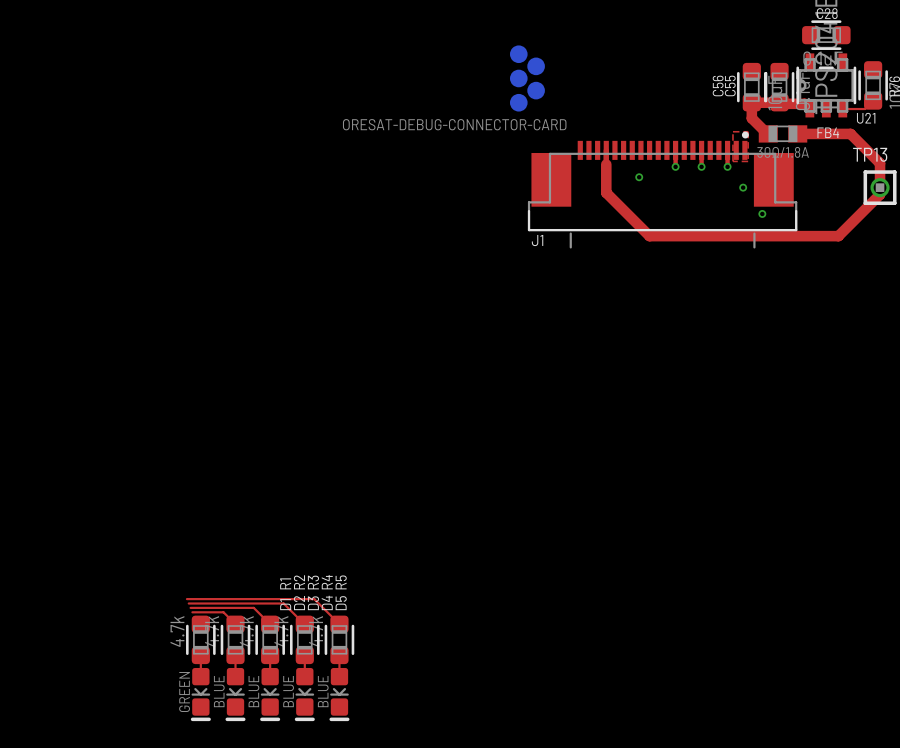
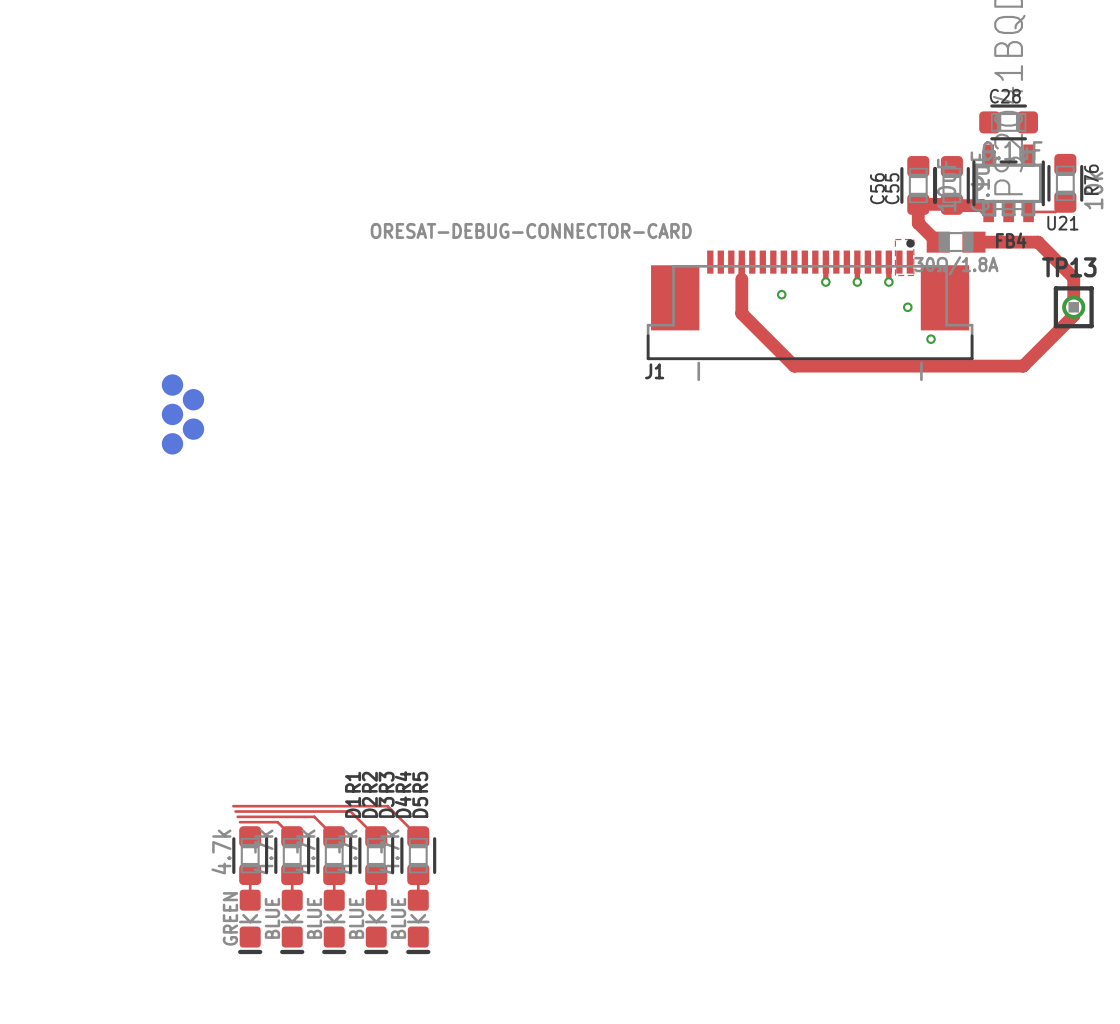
part: (518, 54) -> none
part: (536, 66) -> none
part: (518, 78) -> none
part: (536, 90) -> none
part: (518, 102) -> none
part: none -> (172, 385)
part: none -> (193, 399)
part: none -> (172, 414)
part: none -> (193, 429)
part: none -> (172, 443)

